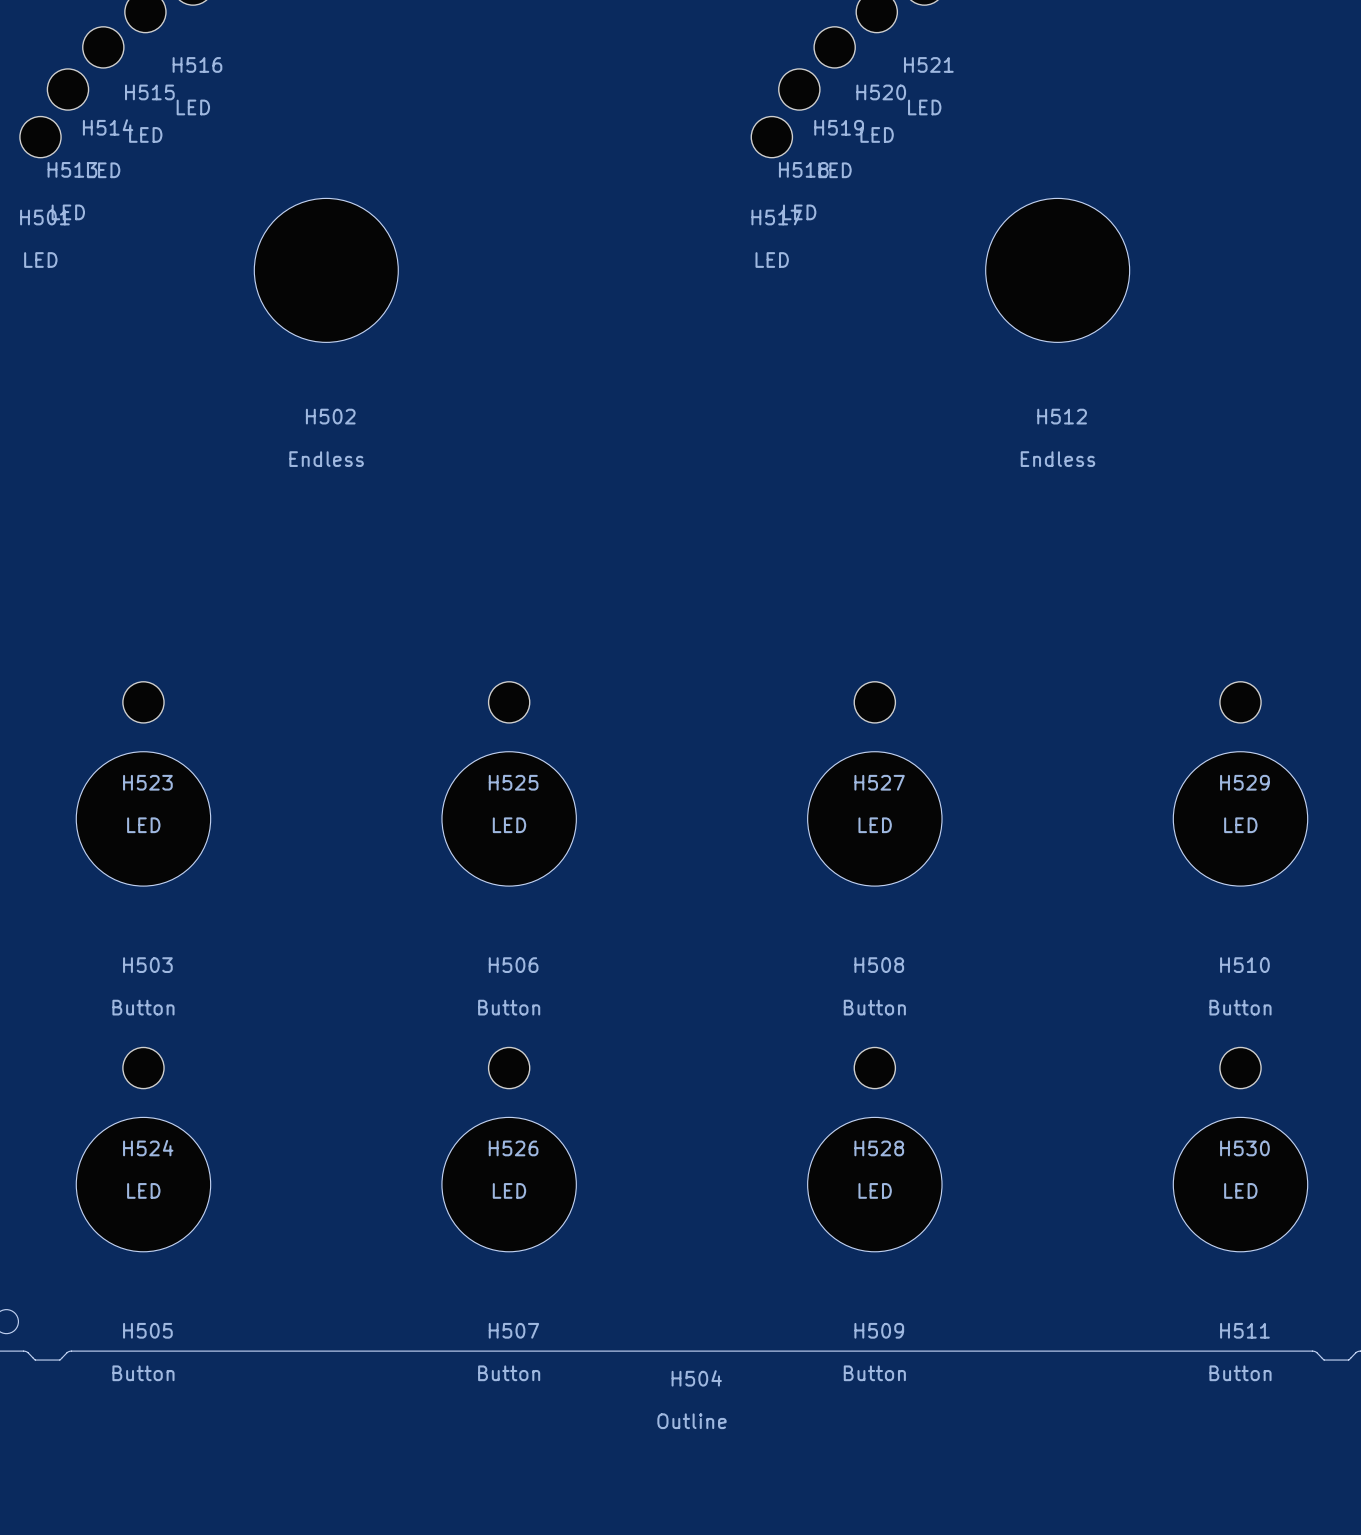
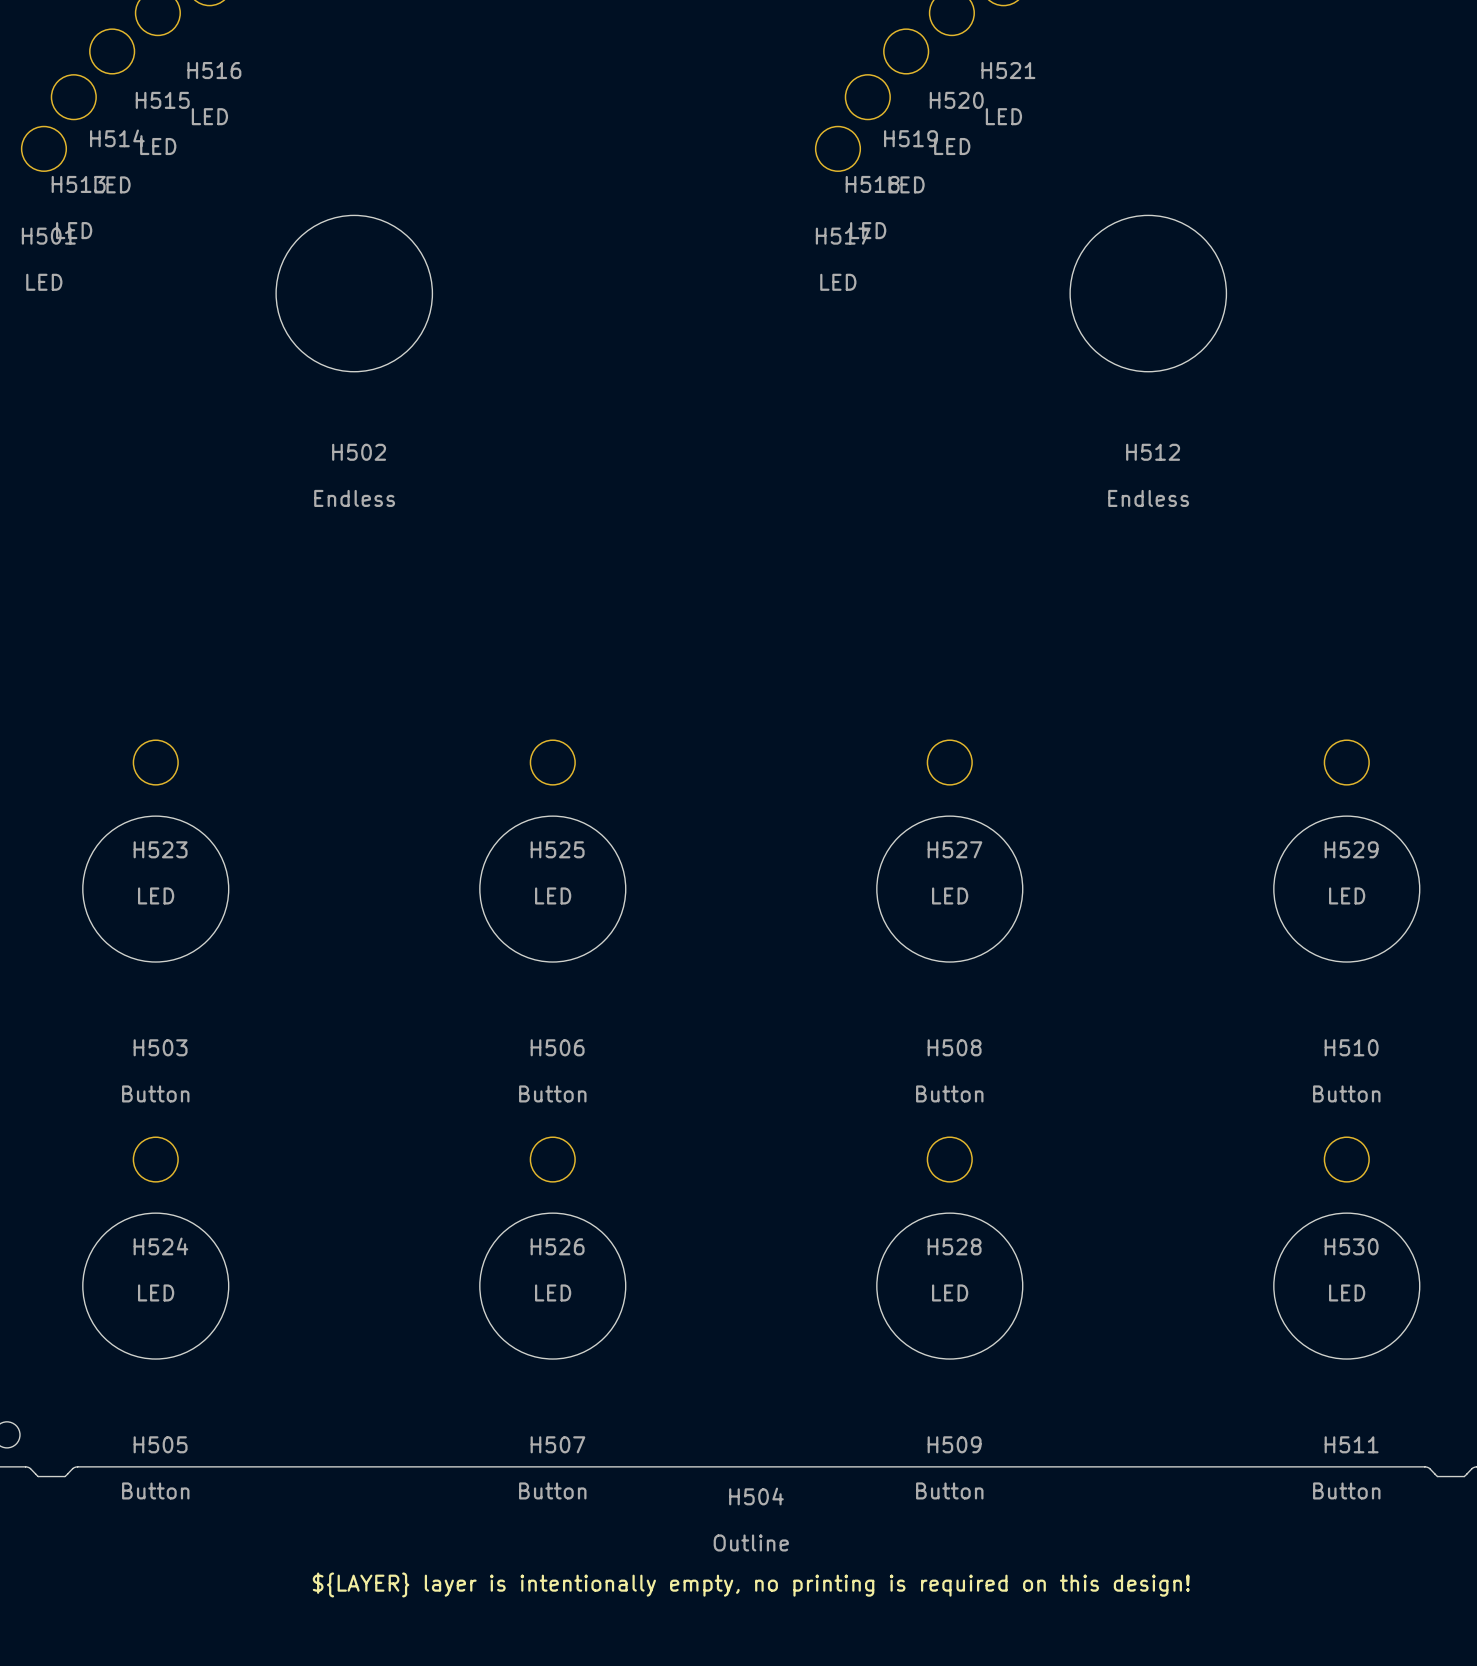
text: none -> ${LAYER} layer is intentionally empty, no printing is required on this design! (751, 1584)

